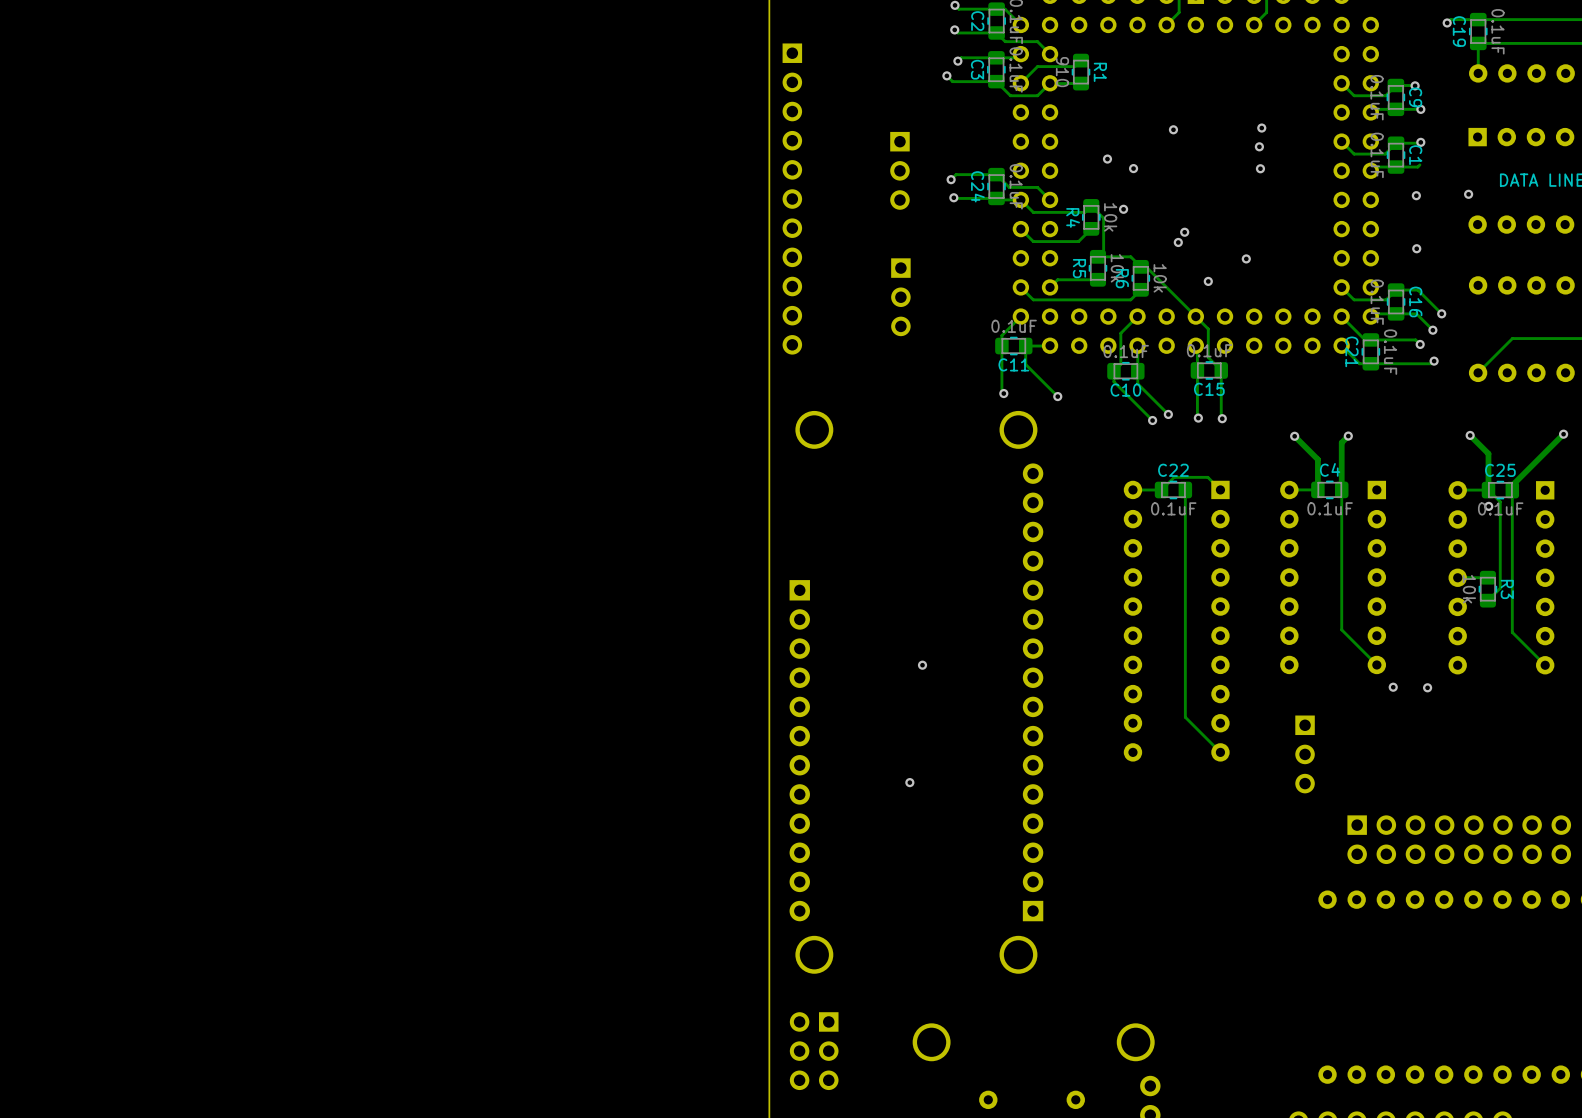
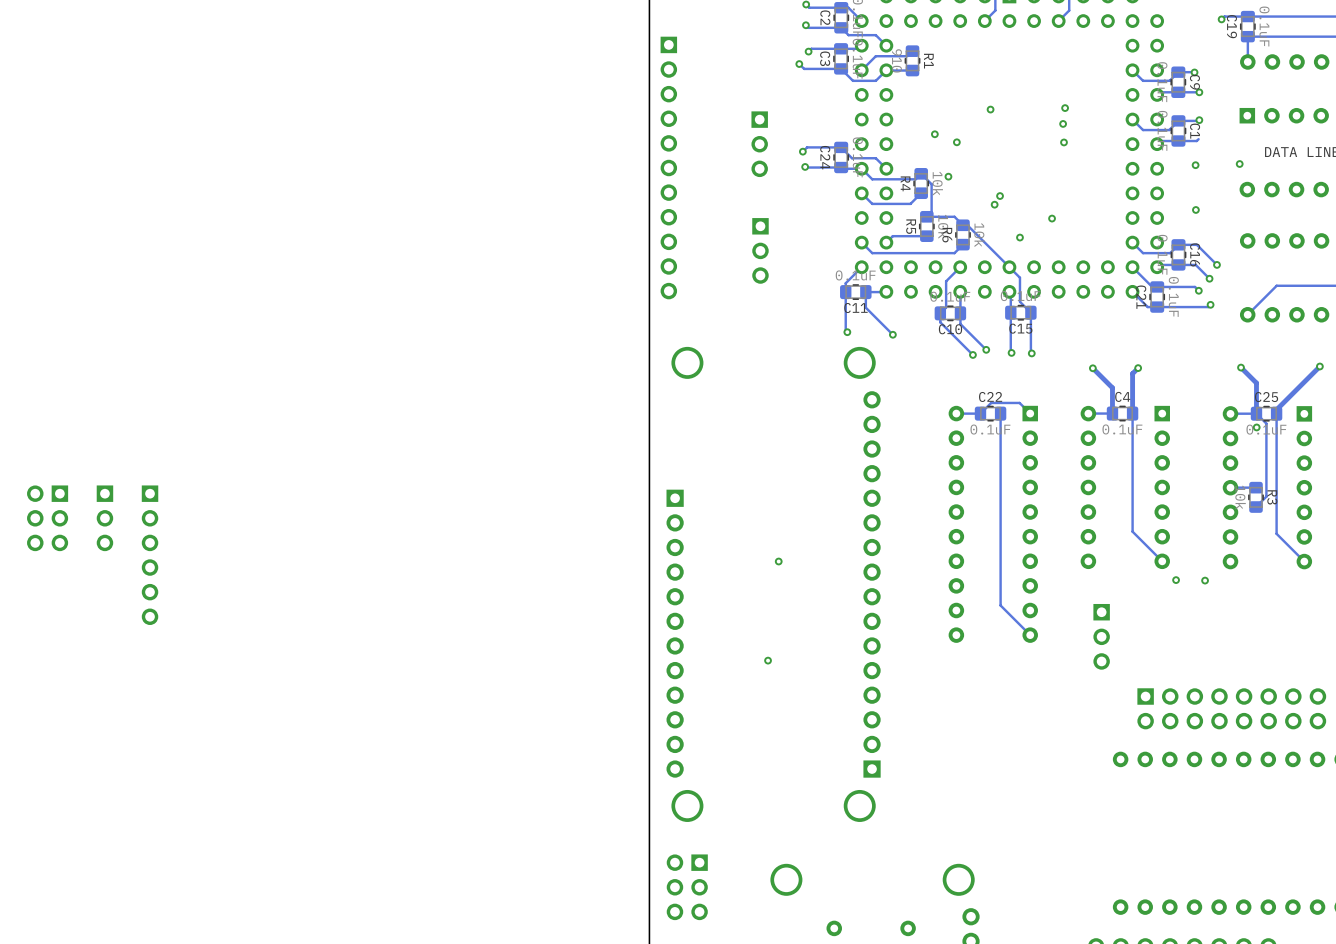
part: none -> (47, 518)
part: none -> (104, 518)
part: none -> (150, 555)

